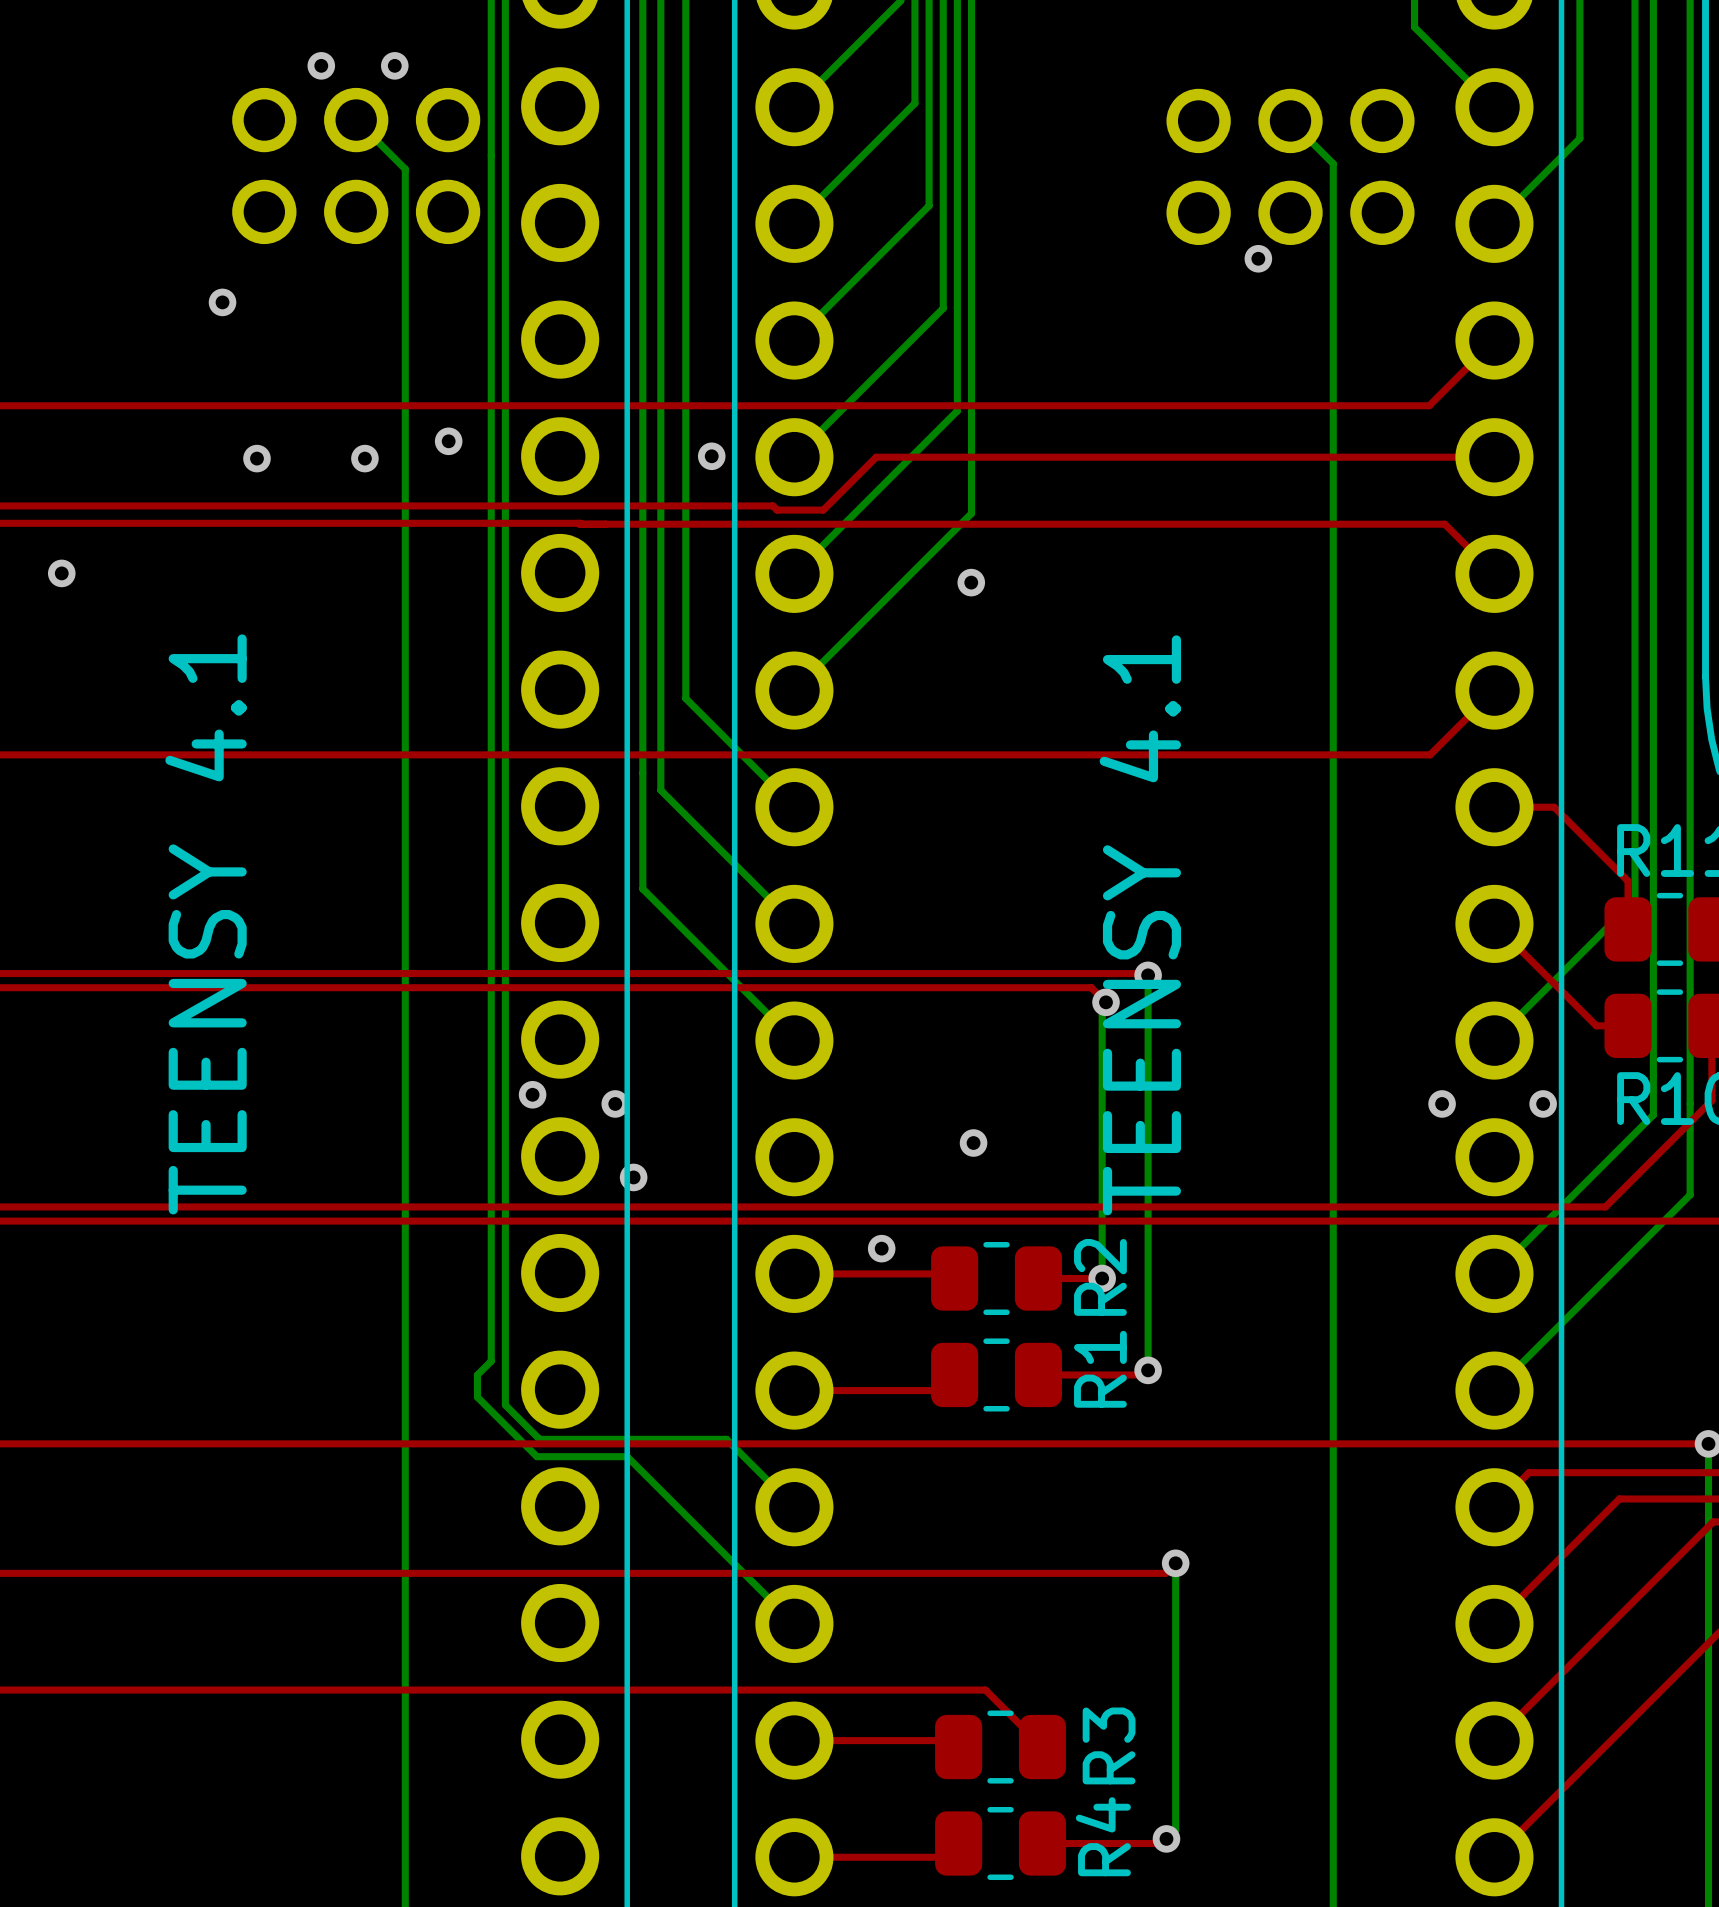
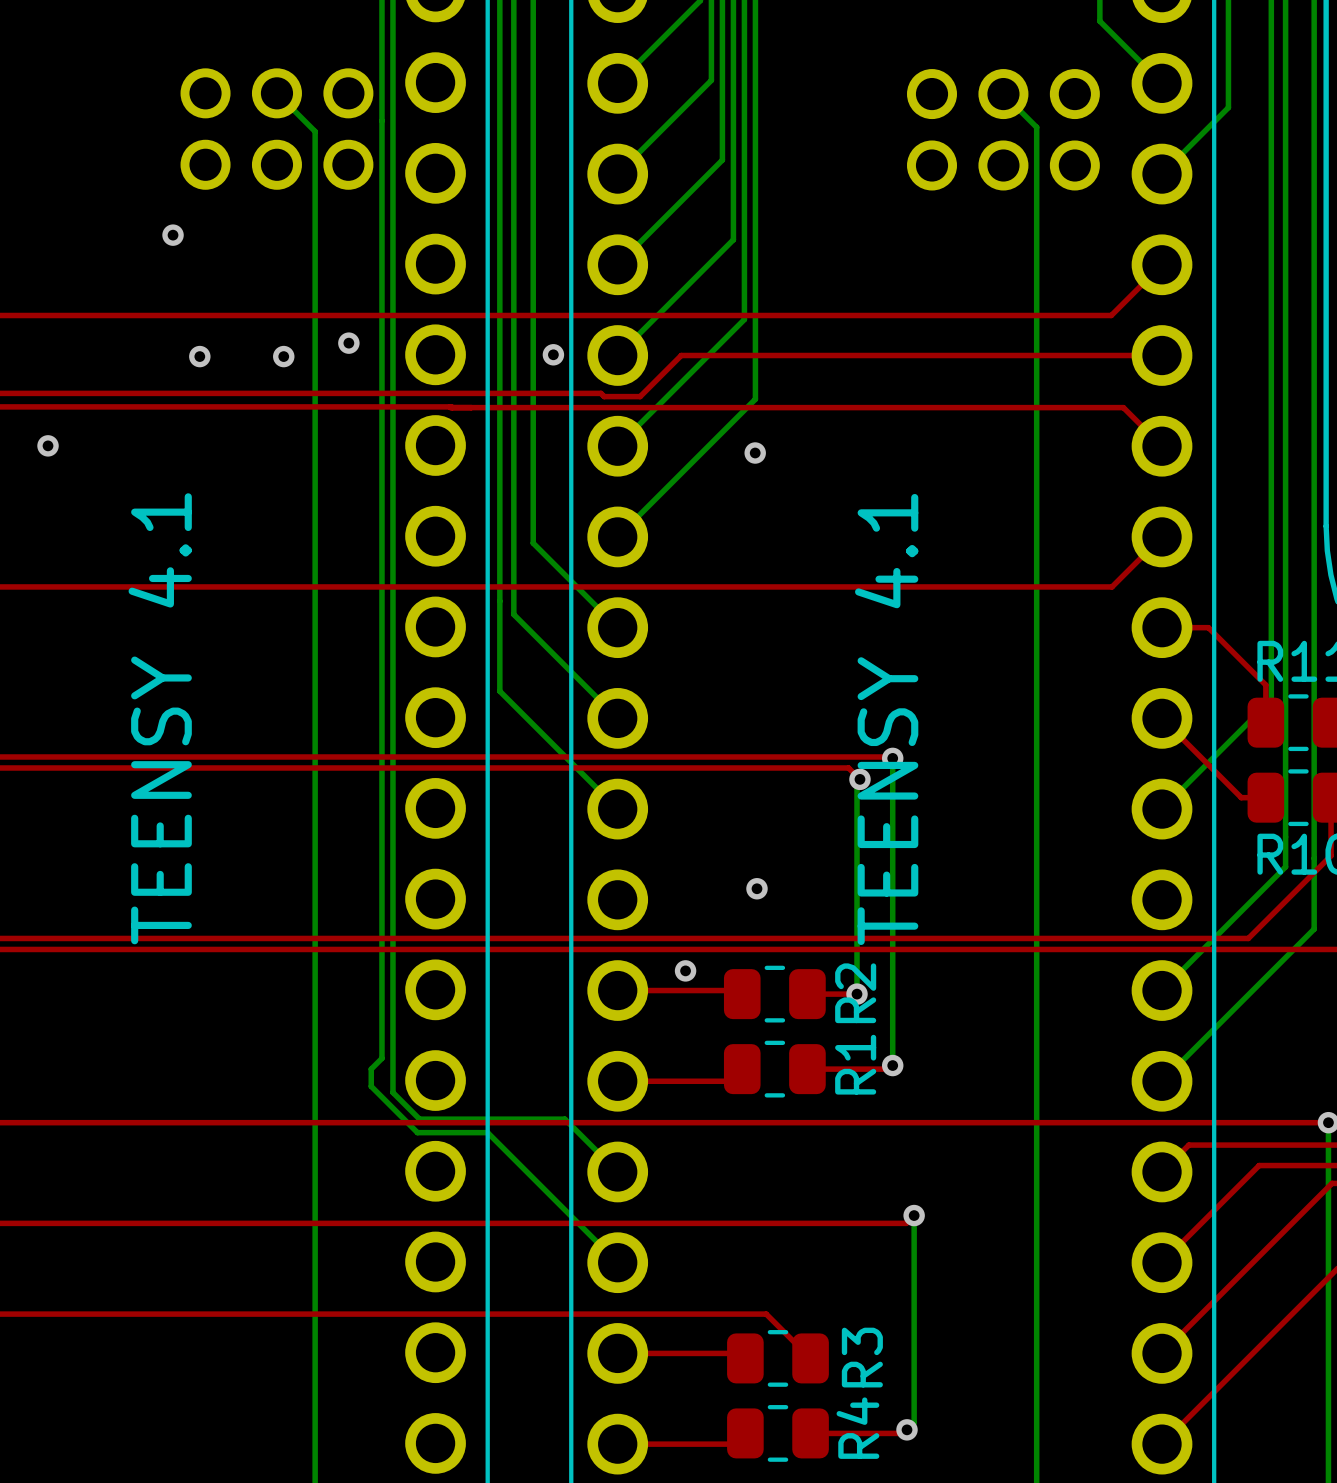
via: (321, 65) -> none
via: (394, 65) -> none
via: (1258, 258) -> none
via: (532, 1094) -> none
via: (615, 1103) -> none
via: (1442, 1103) -> none
via: (1543, 1103) -> none
via: (633, 1177) -> none

